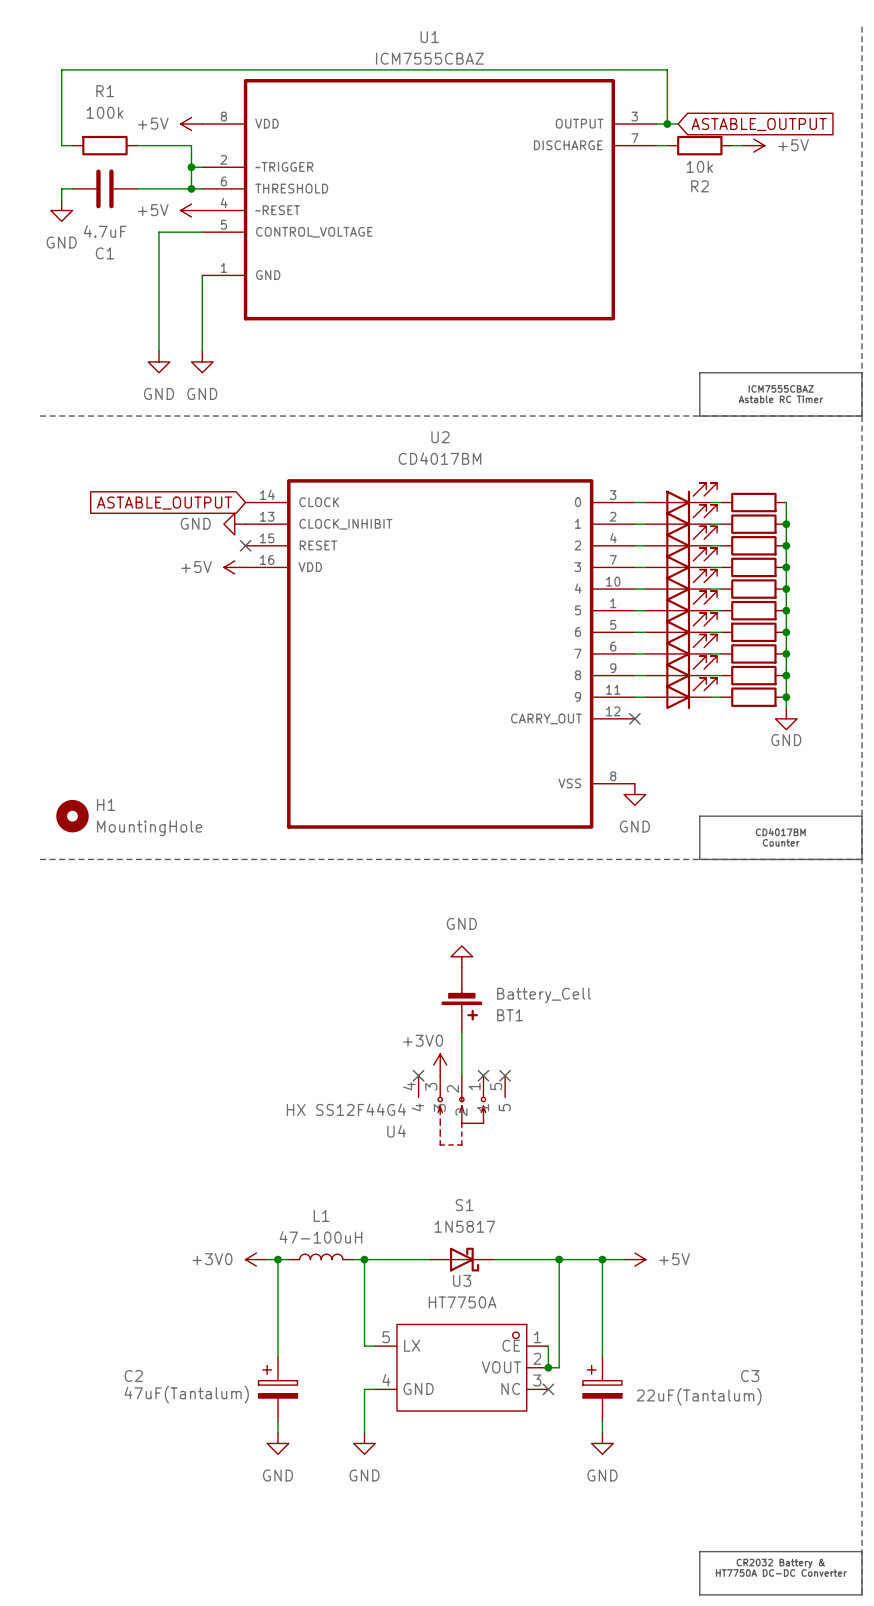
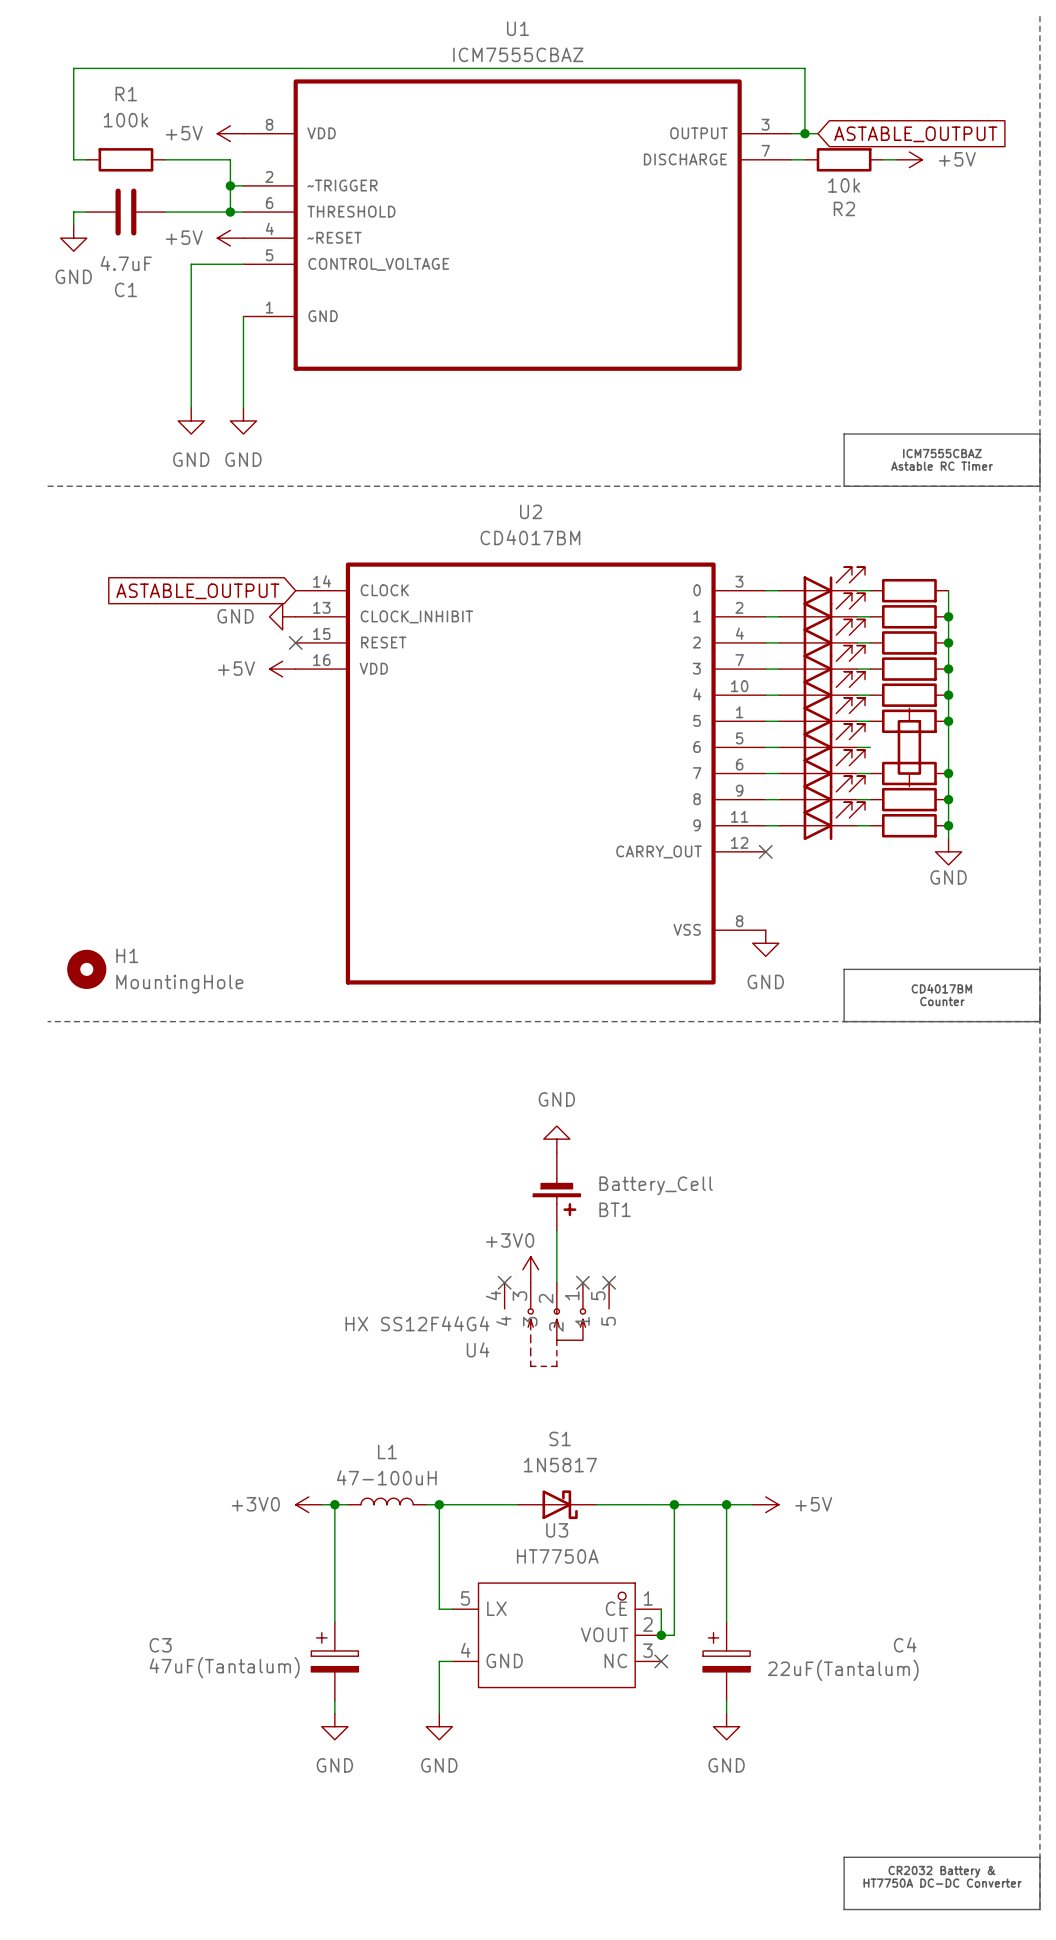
part rotation: 0° (753, 632) -> 90° clockwise (909, 747)
junction: (786, 632) -> none
C2 name: C2 (133, 1376) -> C3 (160, 1645)
C3 name: C3 (750, 1376) -> C4 (905, 1644)

